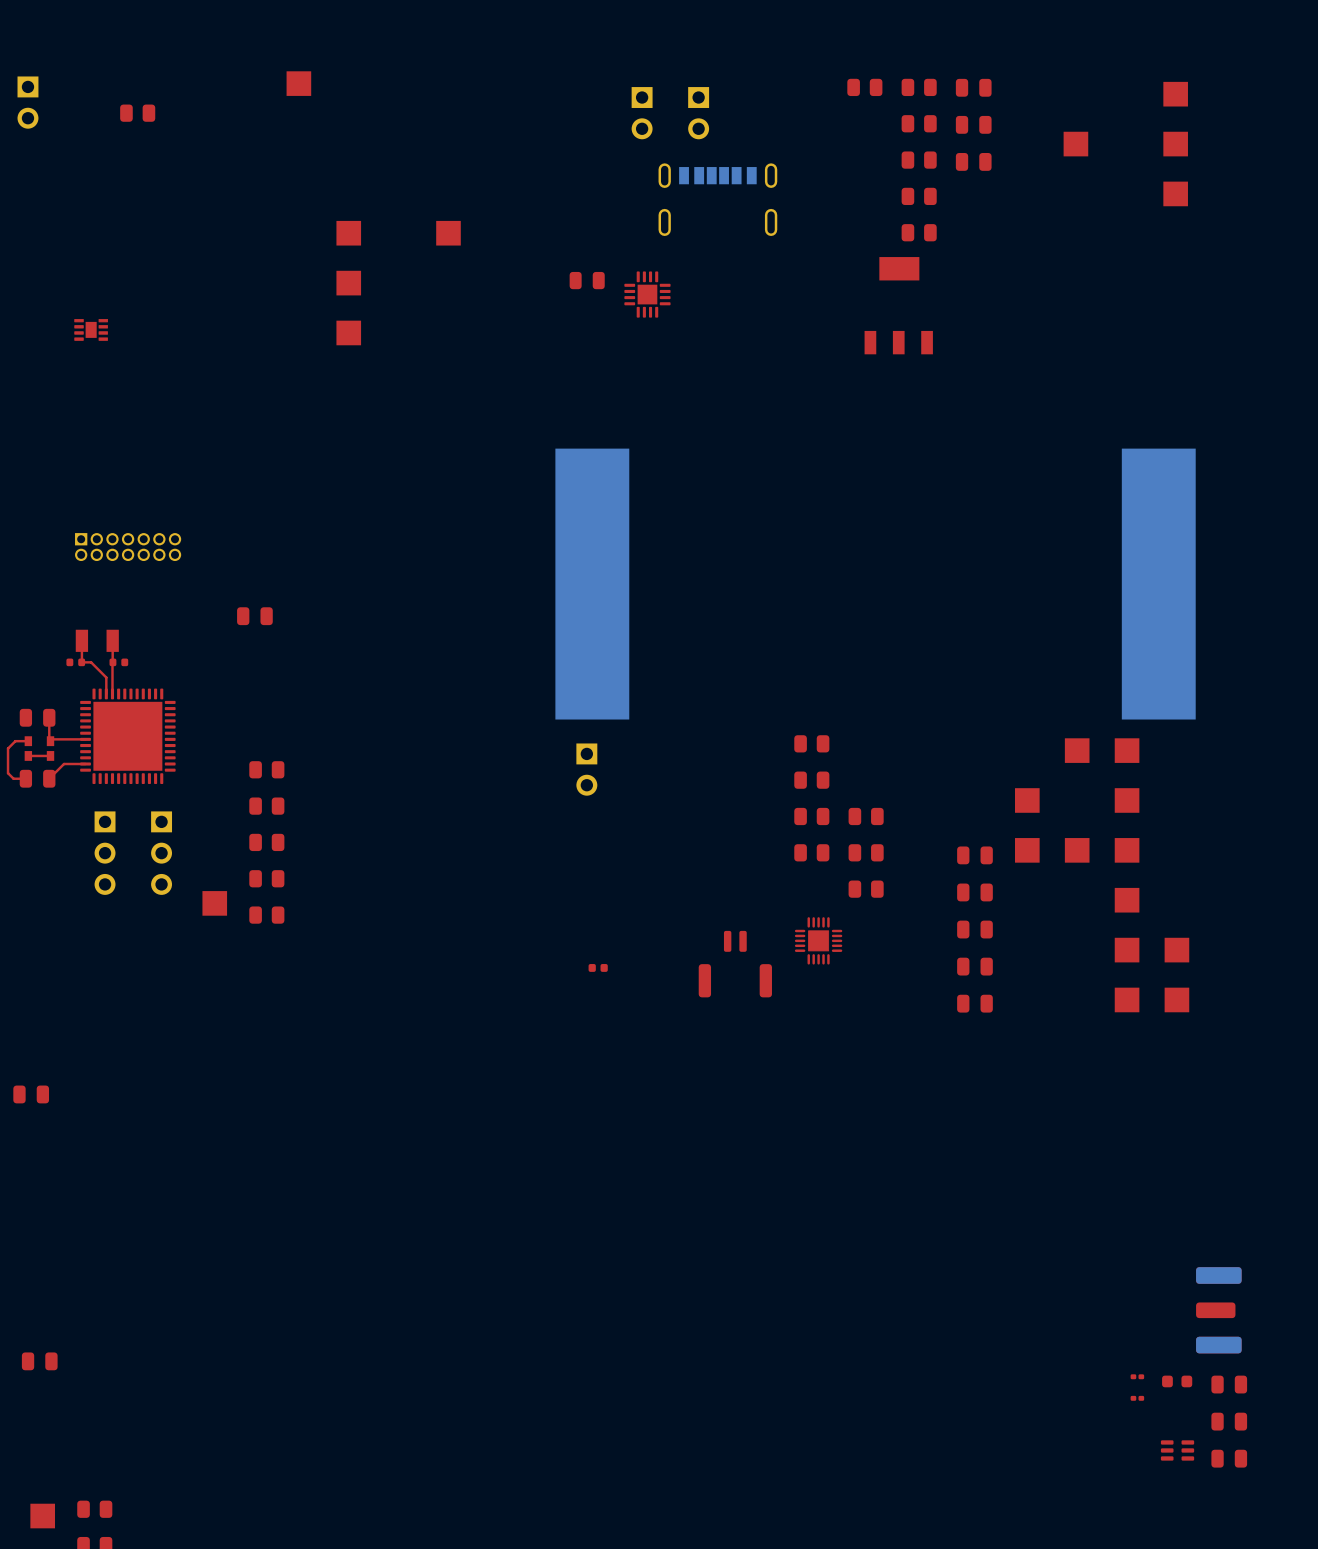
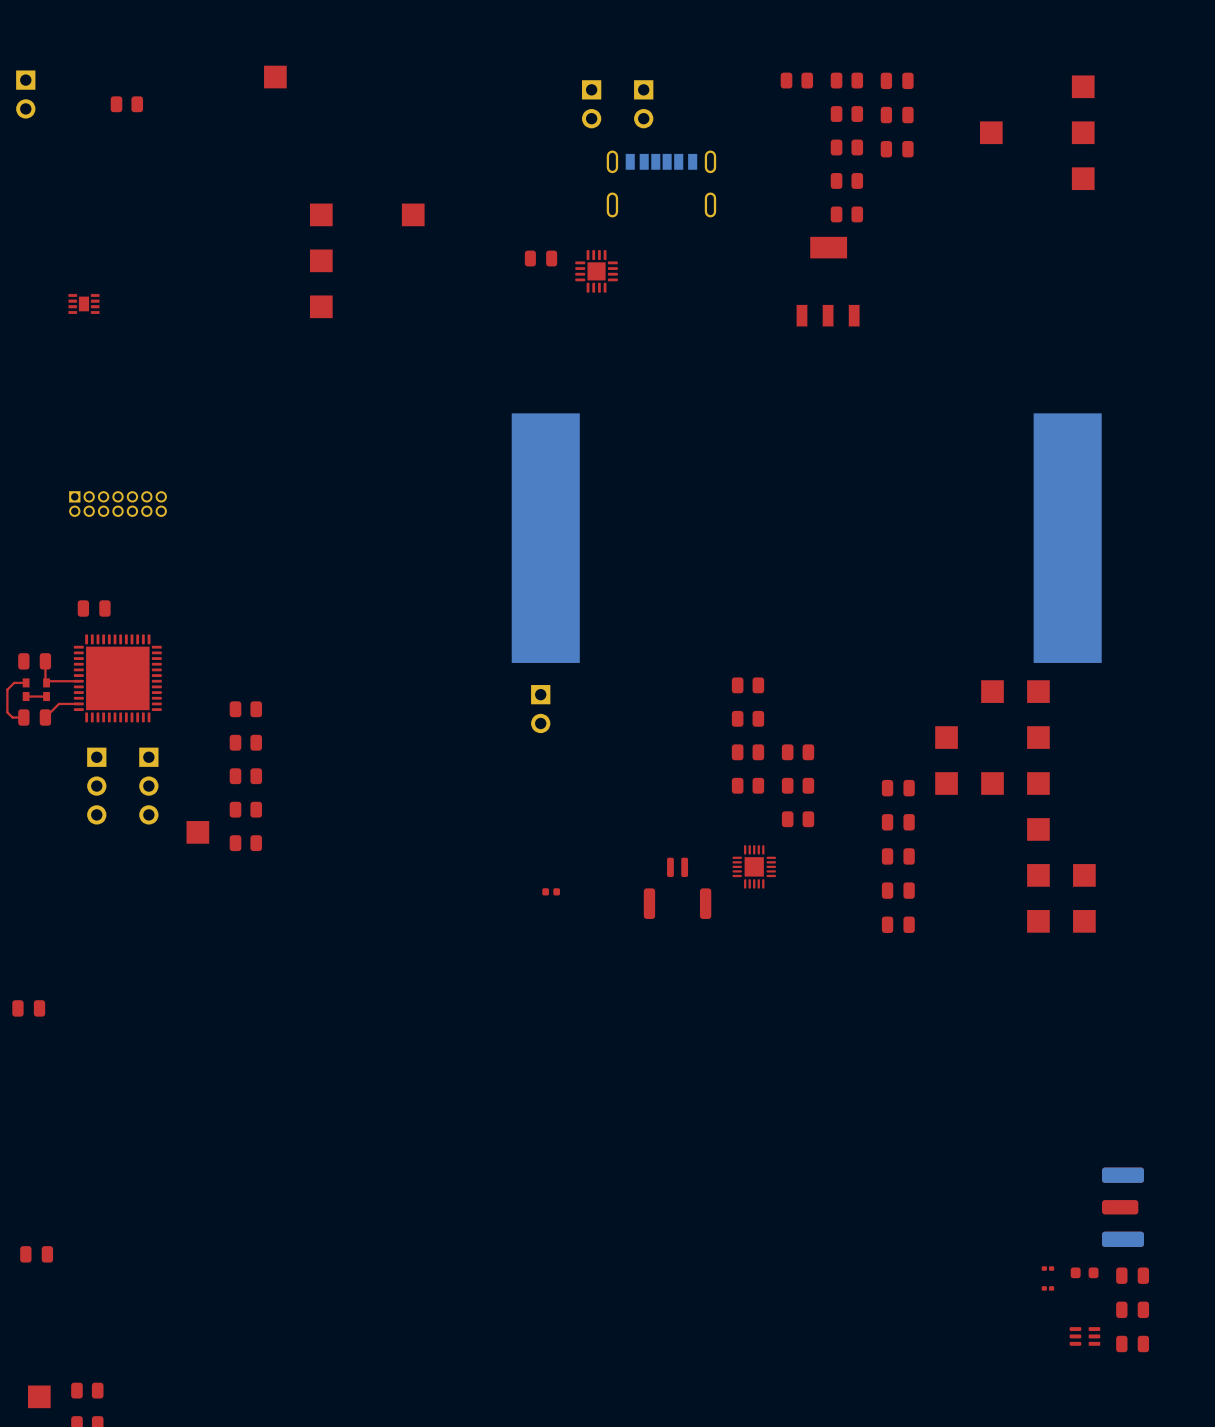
part position: (254, 616) -> (94, 608)
top track: (81, 640) (81, 662) (91, 662) (106, 677) (106, 693) -> none
part: (97, 640) -> none
top track: (112, 640) (112, 693) -> none
part: (75, 662) -> none
part: (118, 662) -> none

